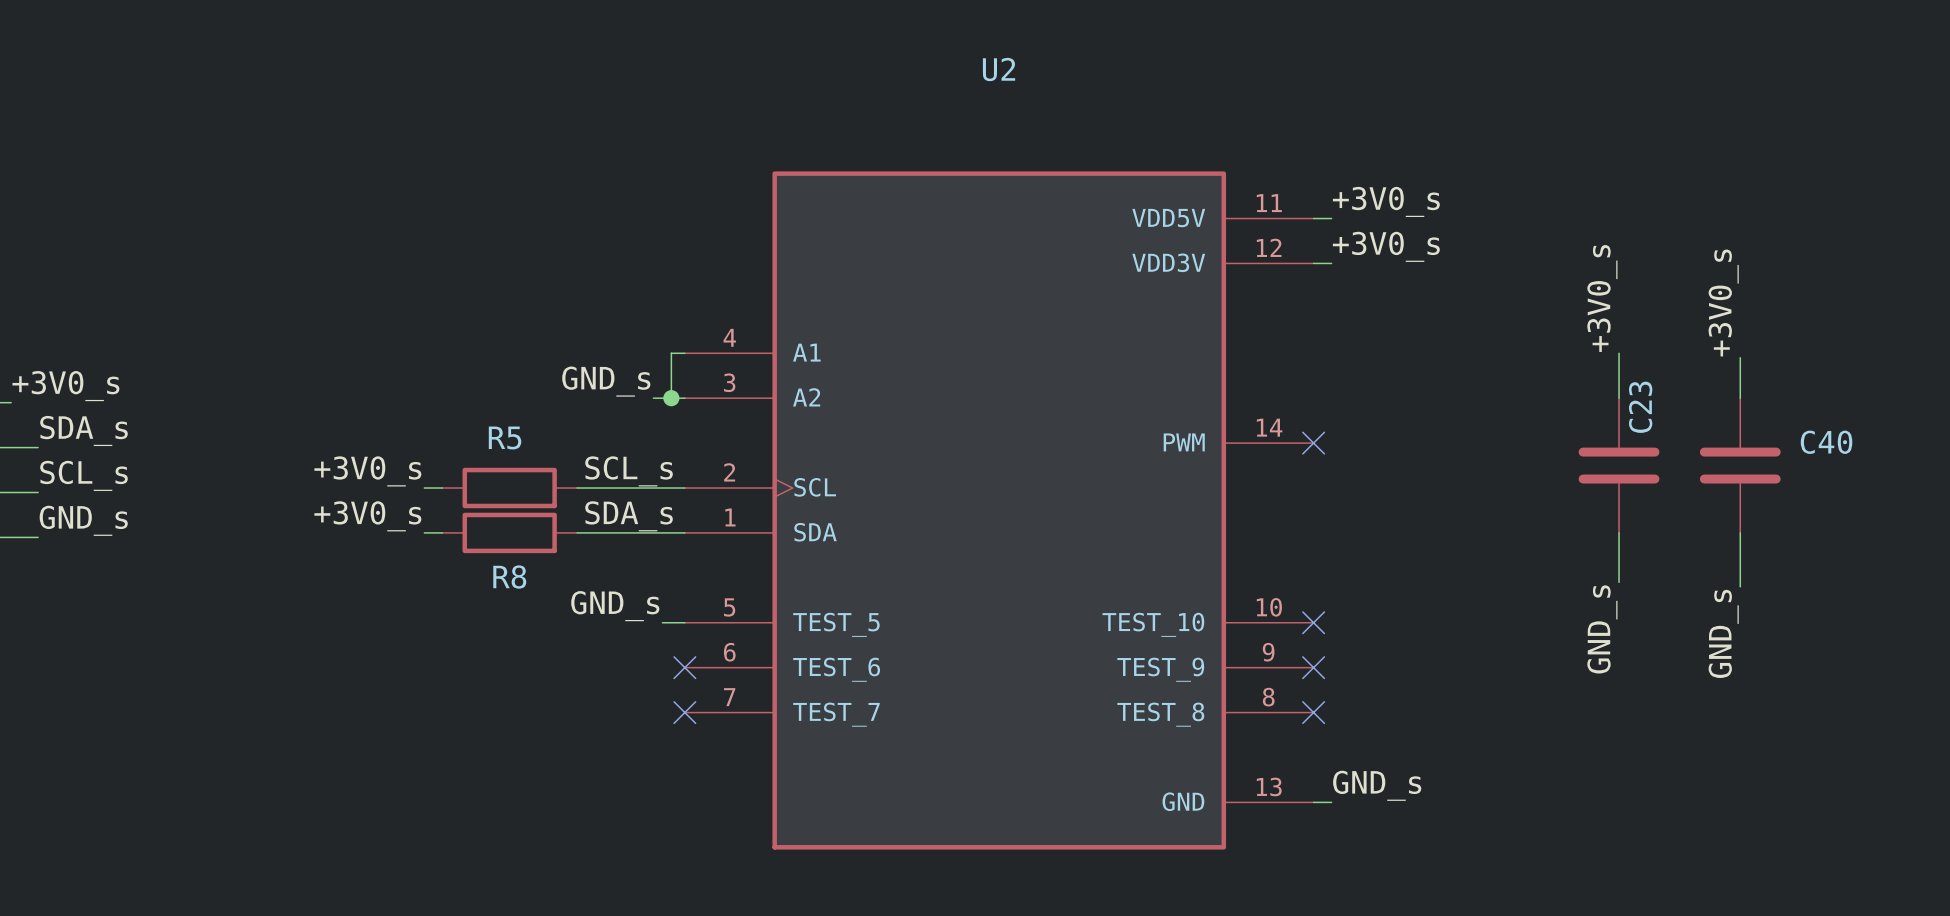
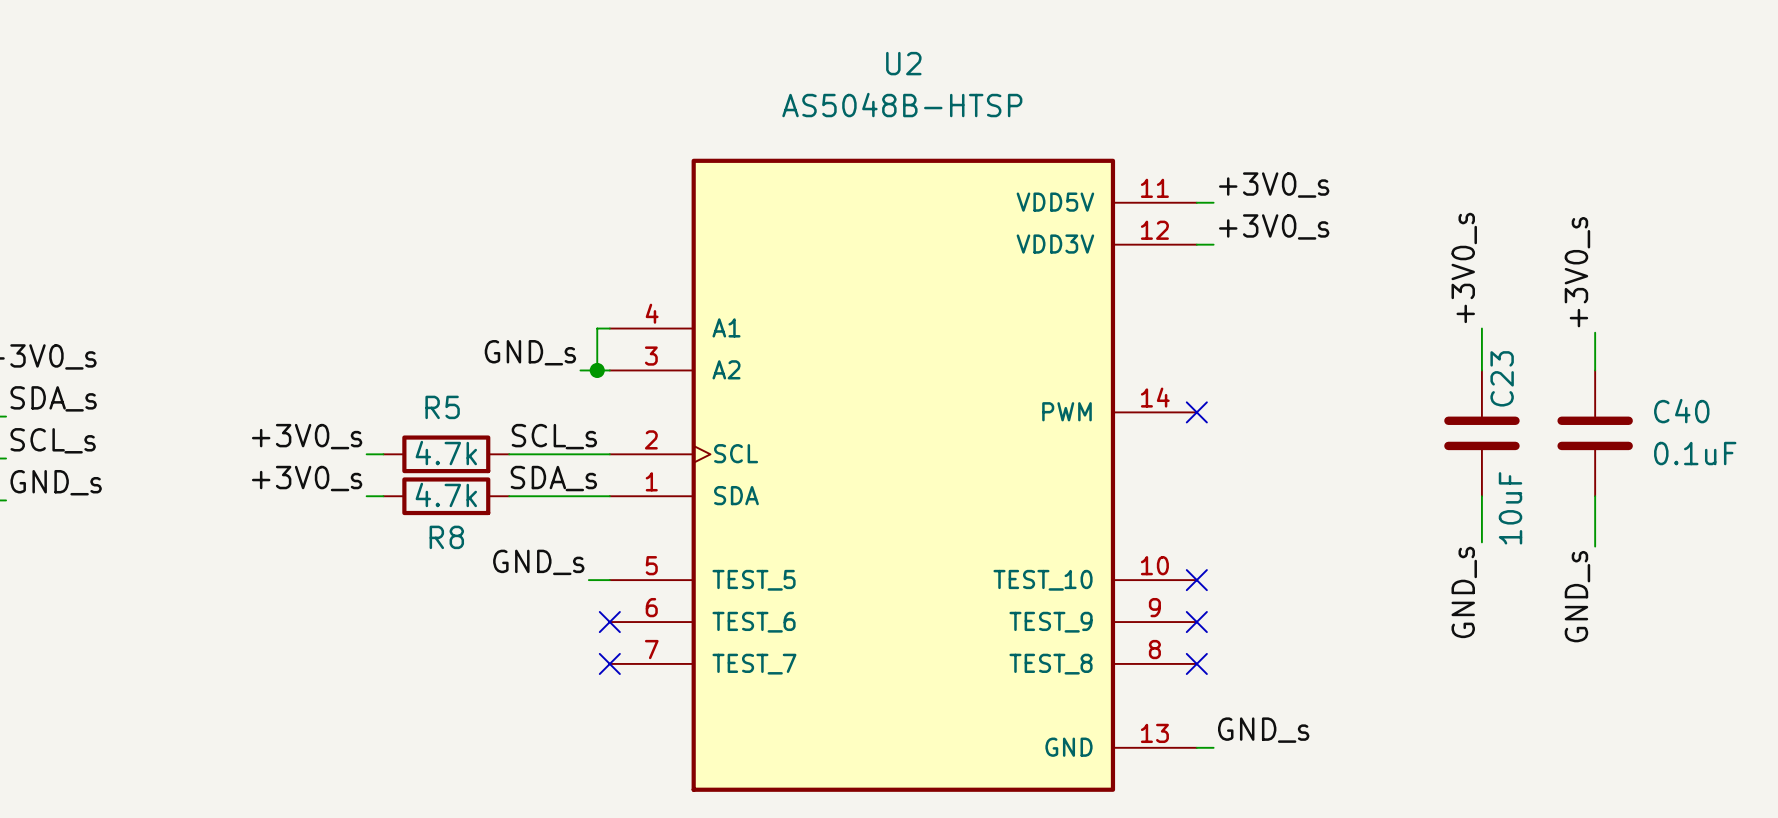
U2 value: none -> AS5048B-HTSP (902, 105)
R5 value: none -> 4.7k (446, 453)
C40 value: none -> 0.1uF (1695, 453)
R8 value: none -> 4.7k (446, 494)
C23 value: none -> 10uF (1510, 508)

